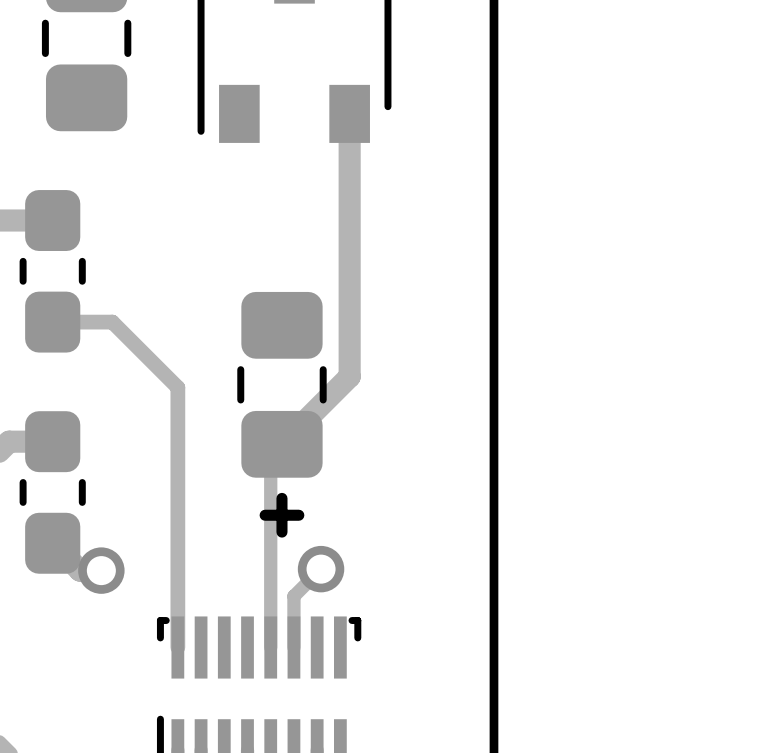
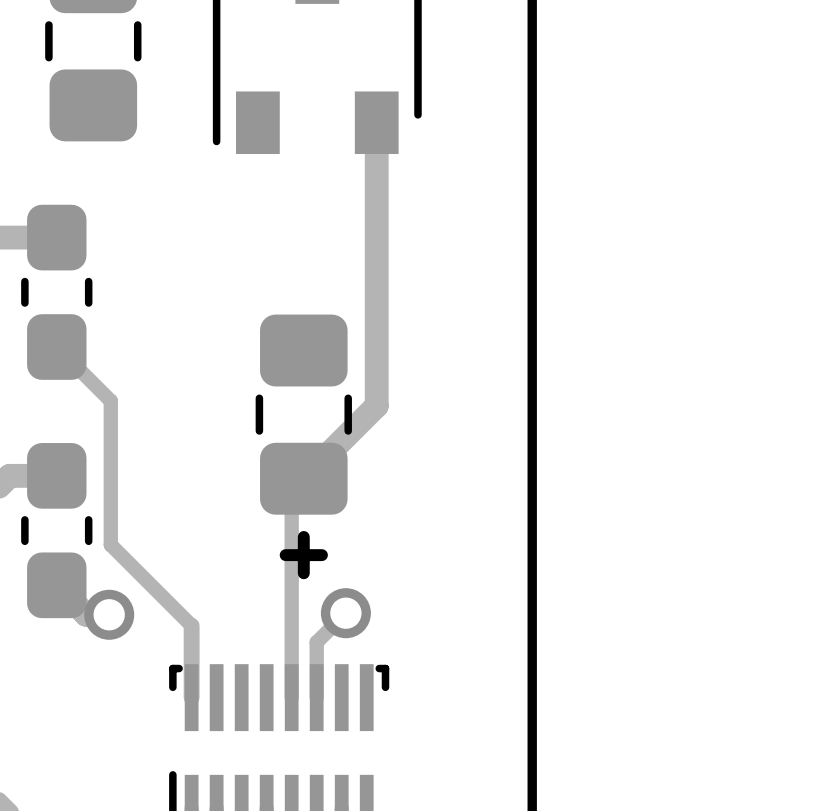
track: (52, 322) (112, 322) (177, 387) (177, 580) -> (56, 347) (110, 401) (110, 544) (191, 625)

